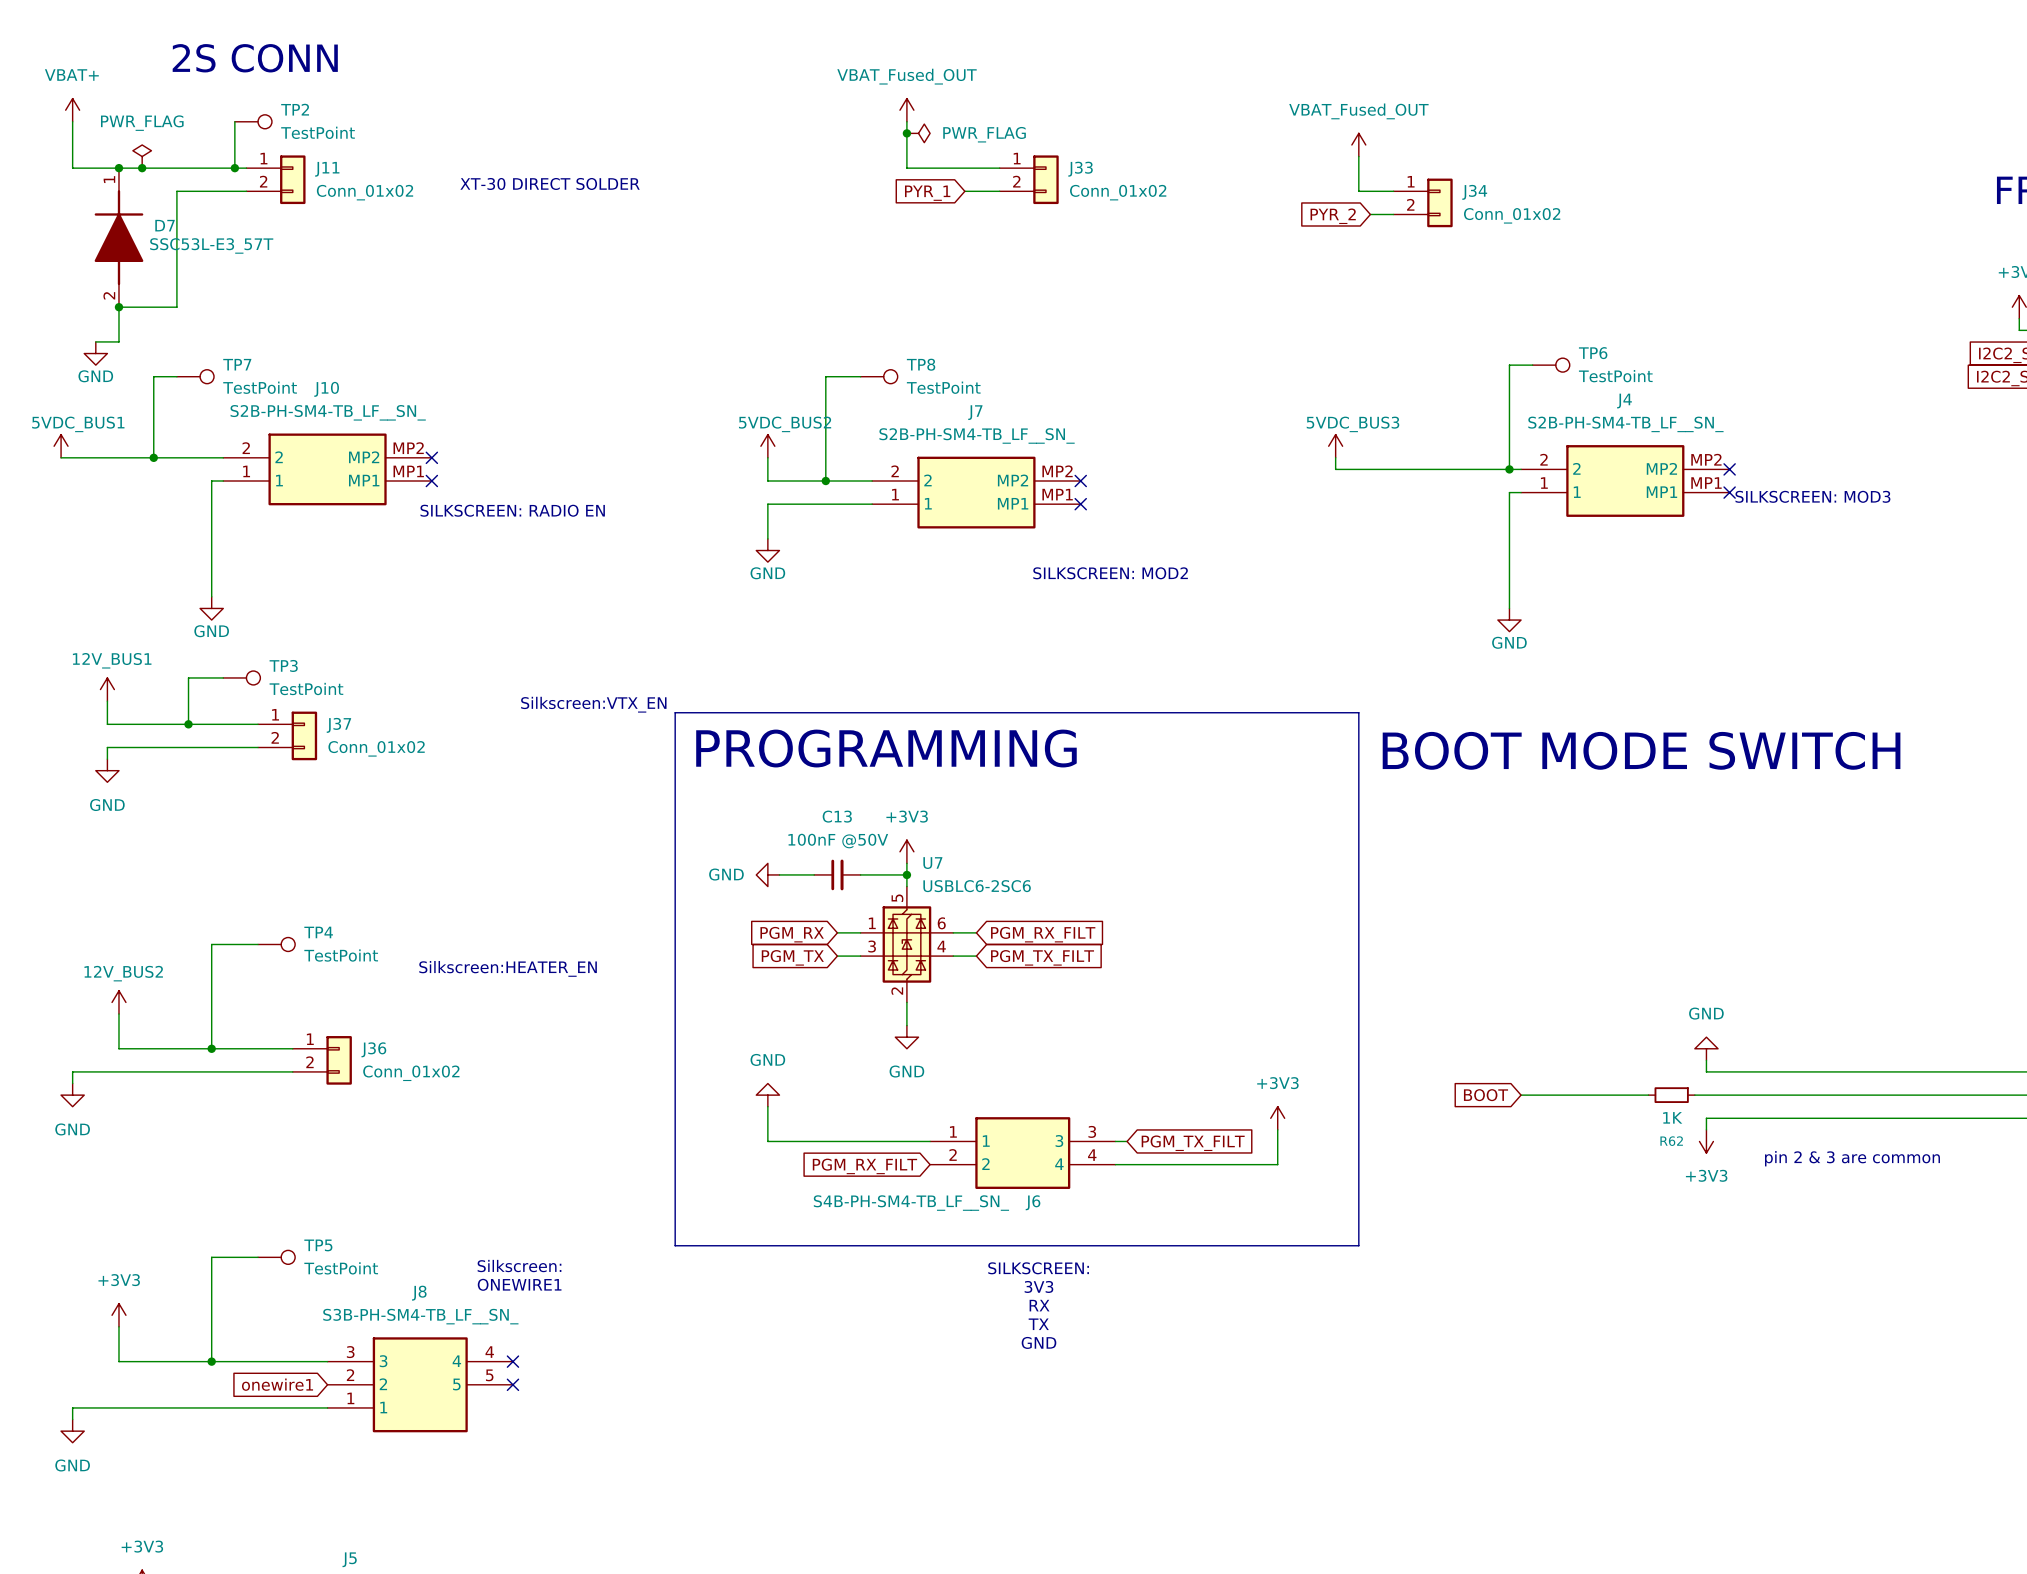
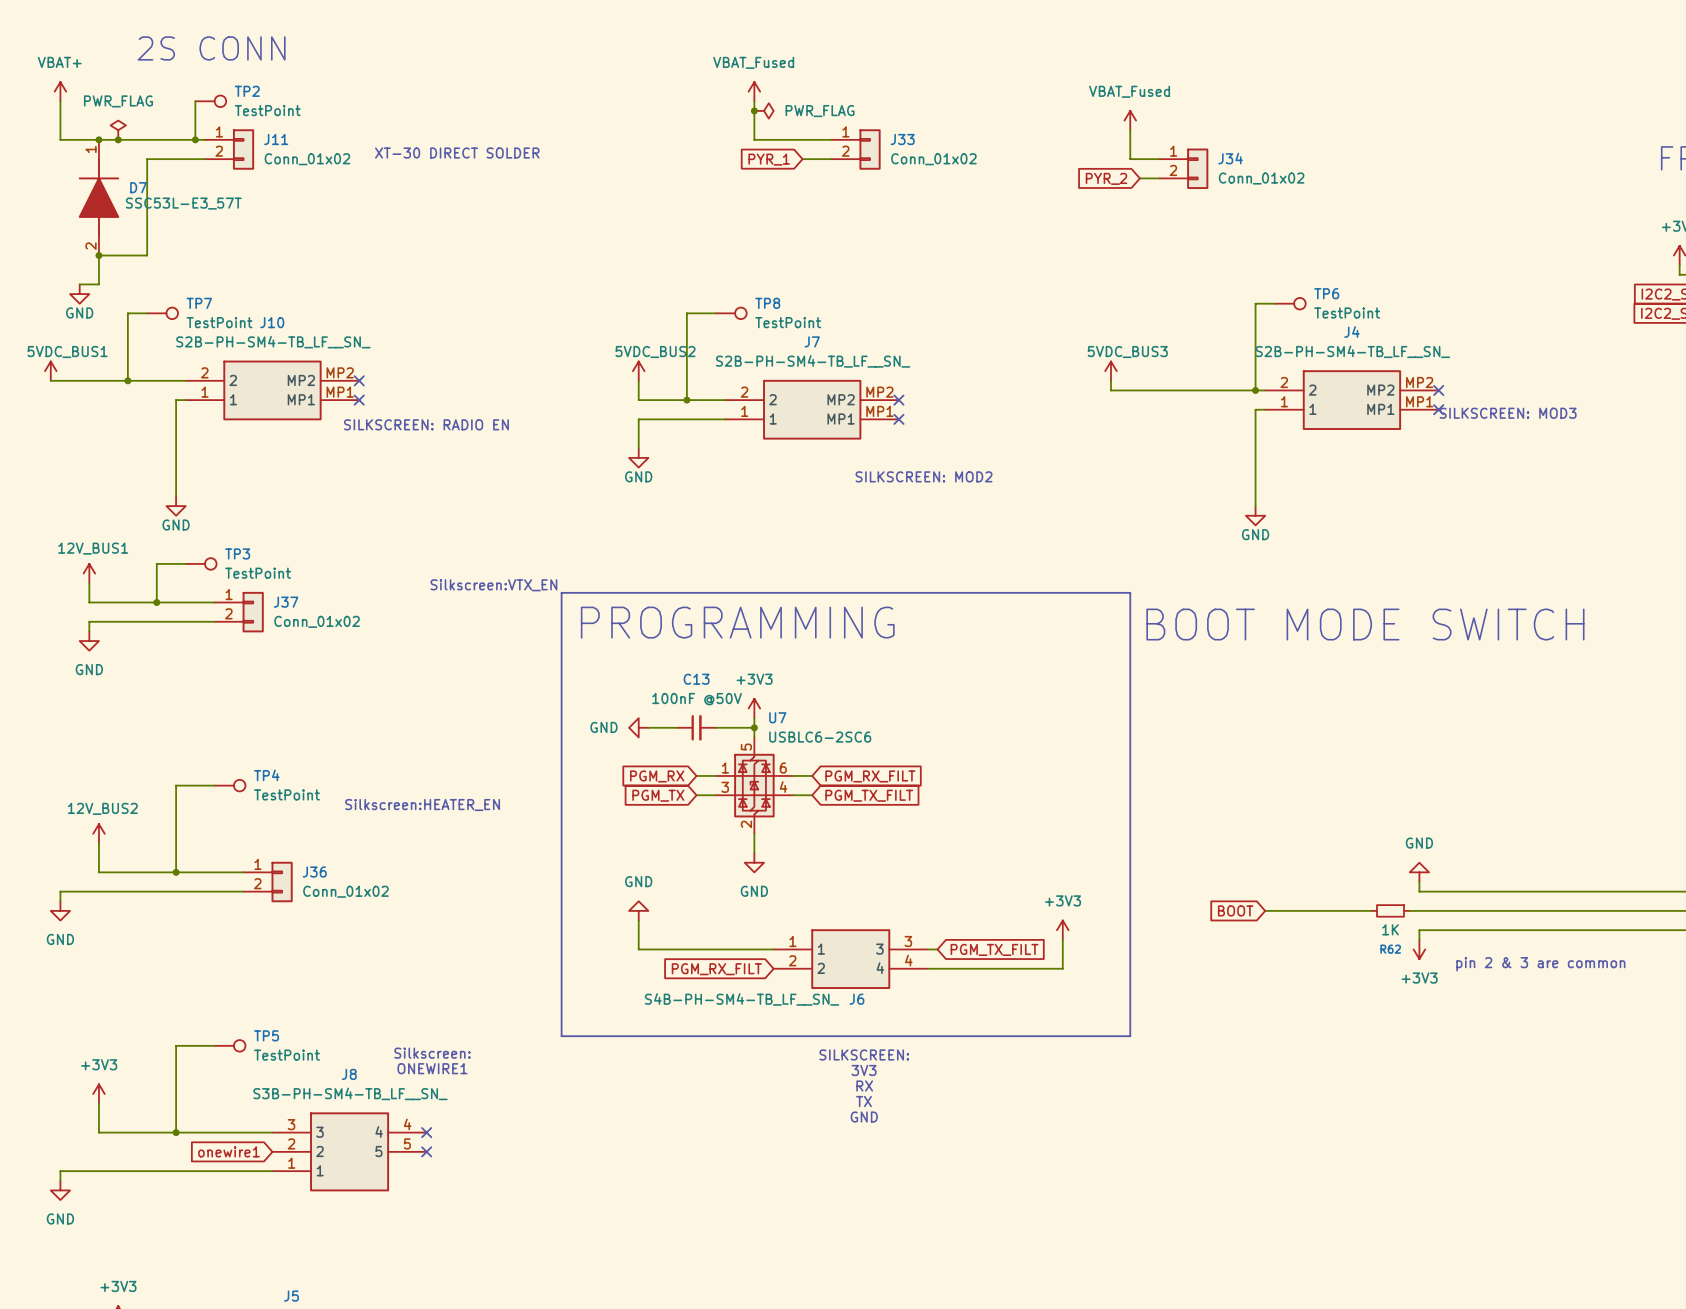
power symbol: VBAT_Fused_OUT (906, 110) -> VBAT_Fused (754, 91)
power symbol: VBAT_Fused_OUT (1358, 144) -> VBAT_Fused (1130, 120)

